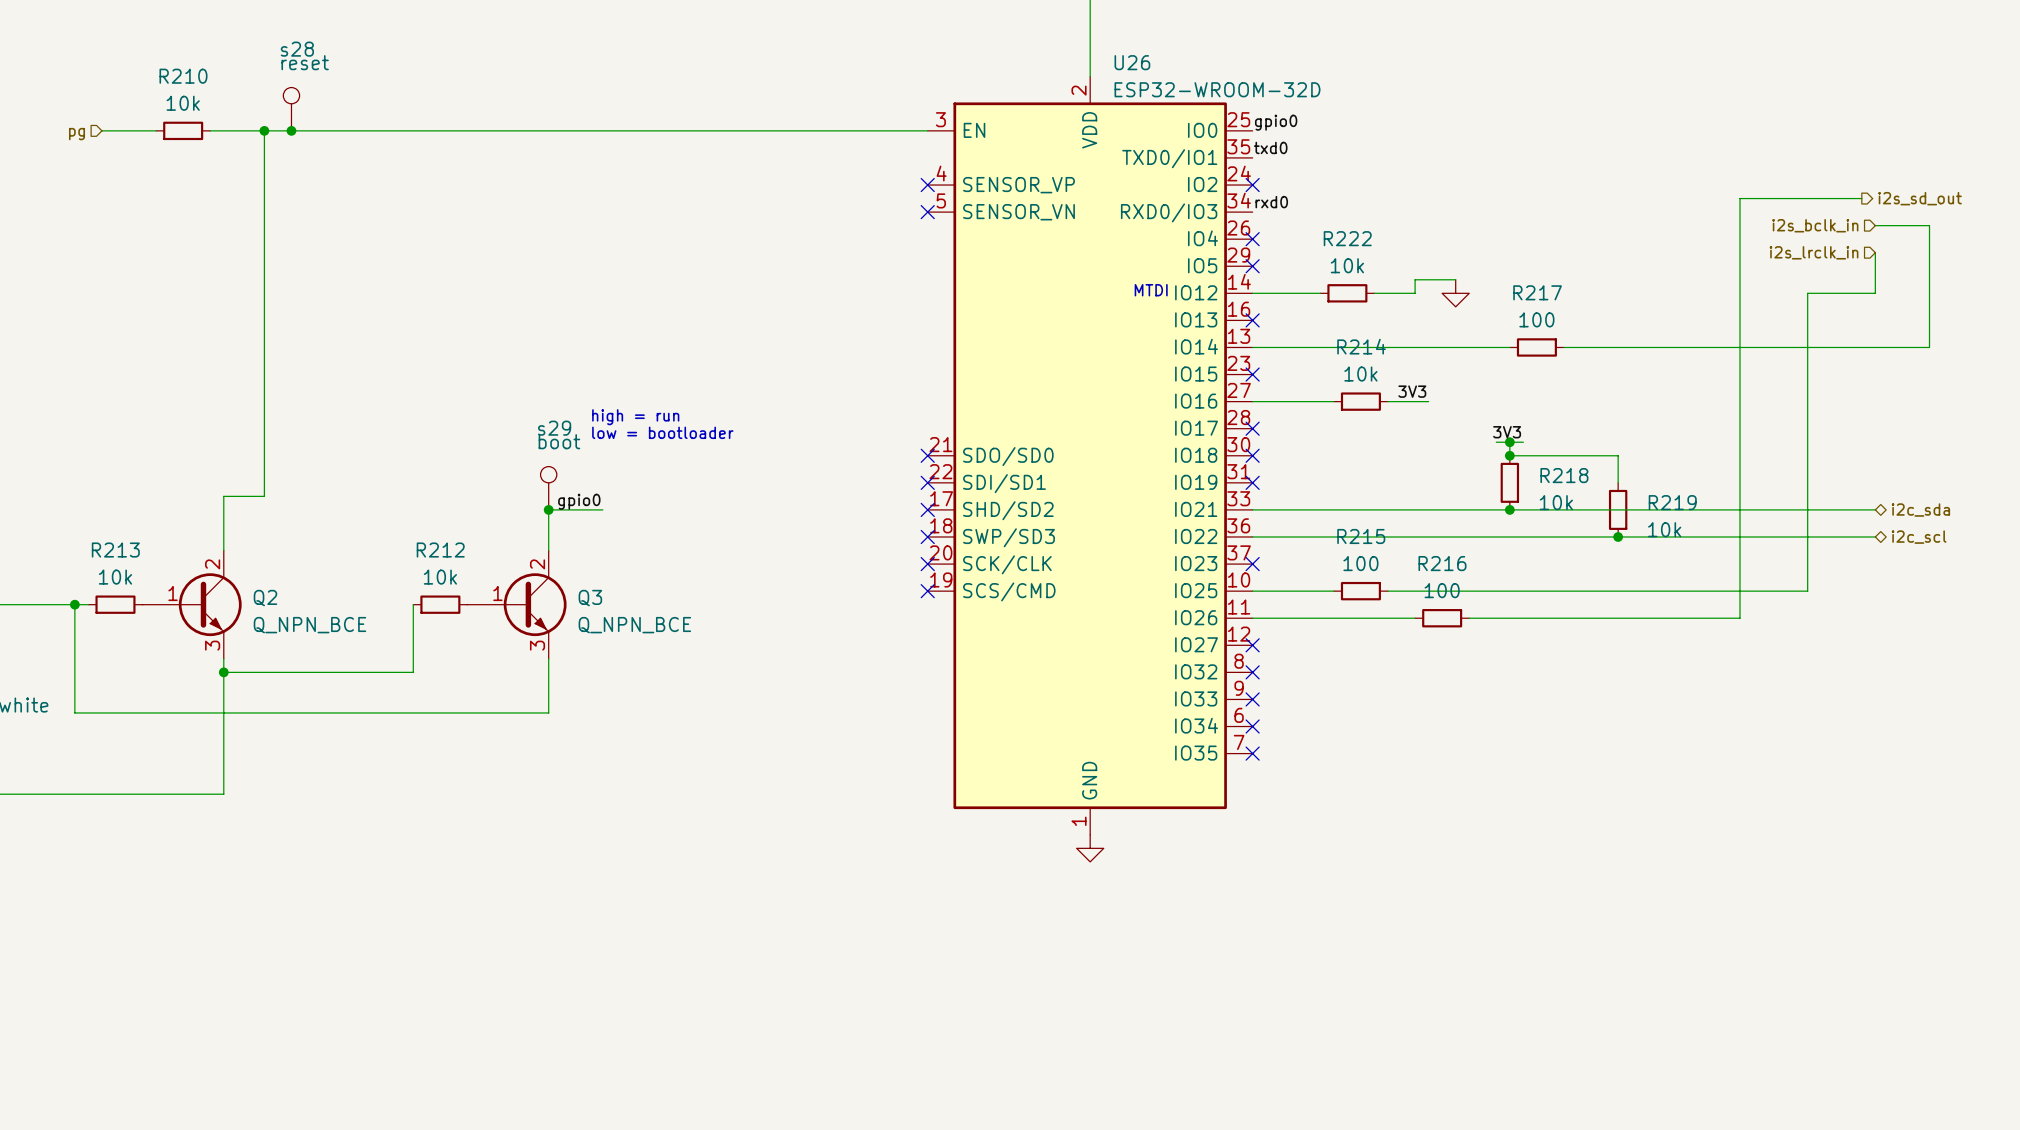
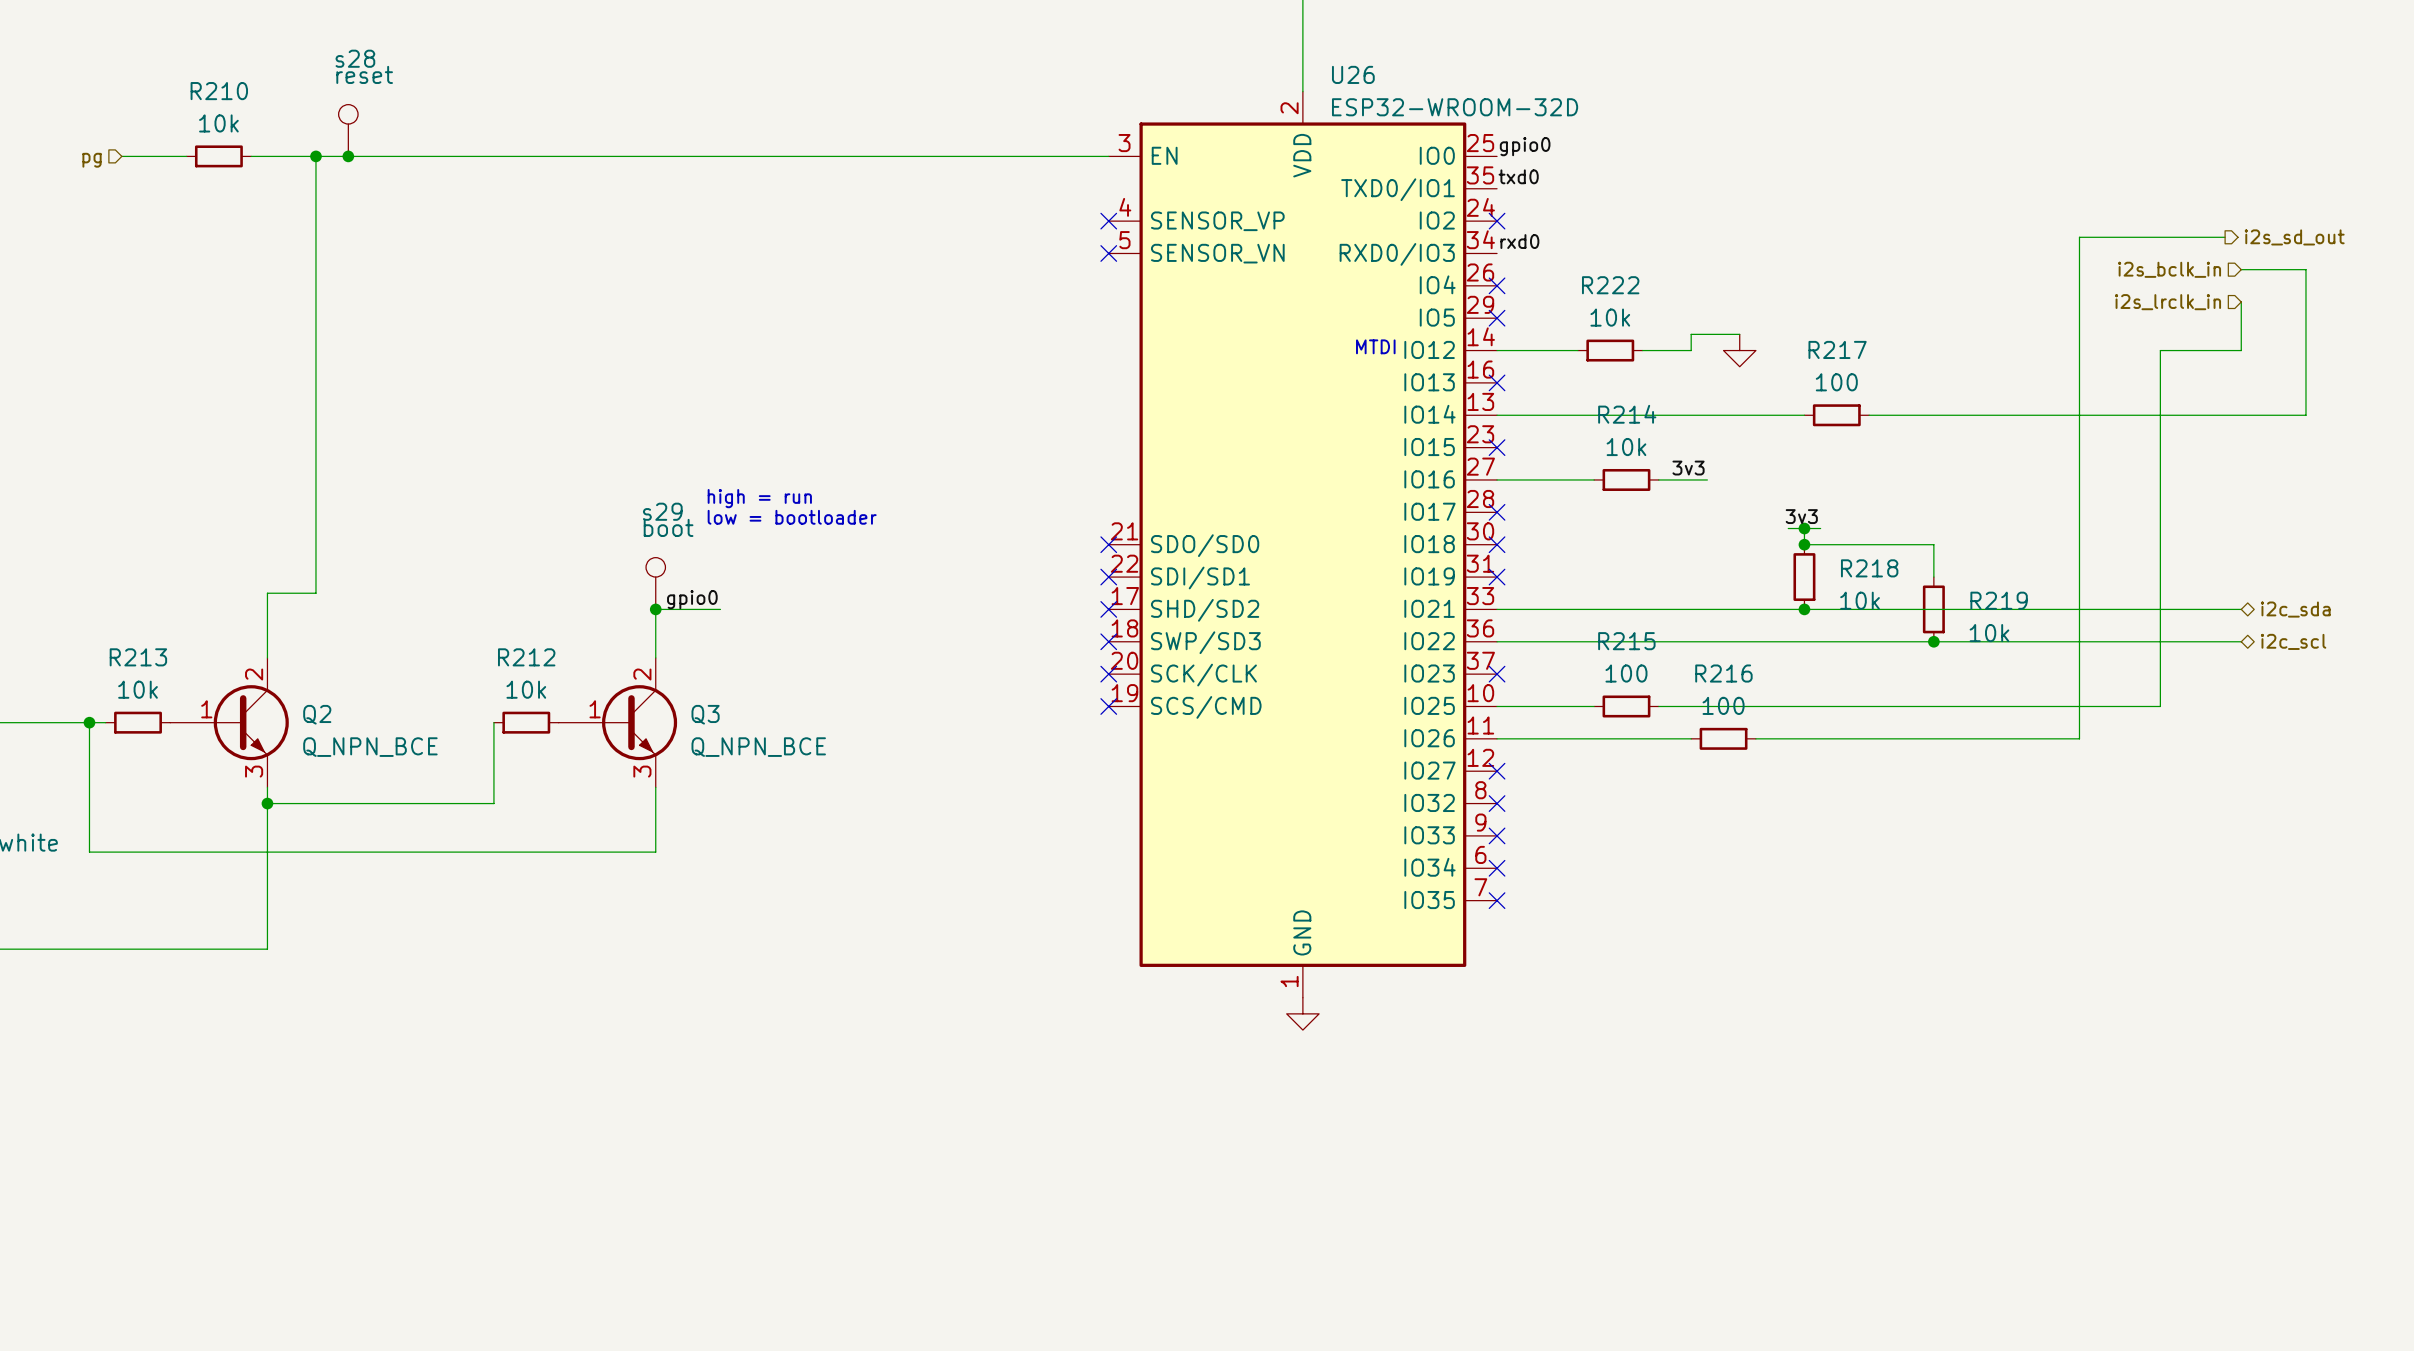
label: 3V3 (1412, 391) -> 3v3 (1688, 468)
label: 3V3 (1507, 432) -> 3v3 (1801, 516)

